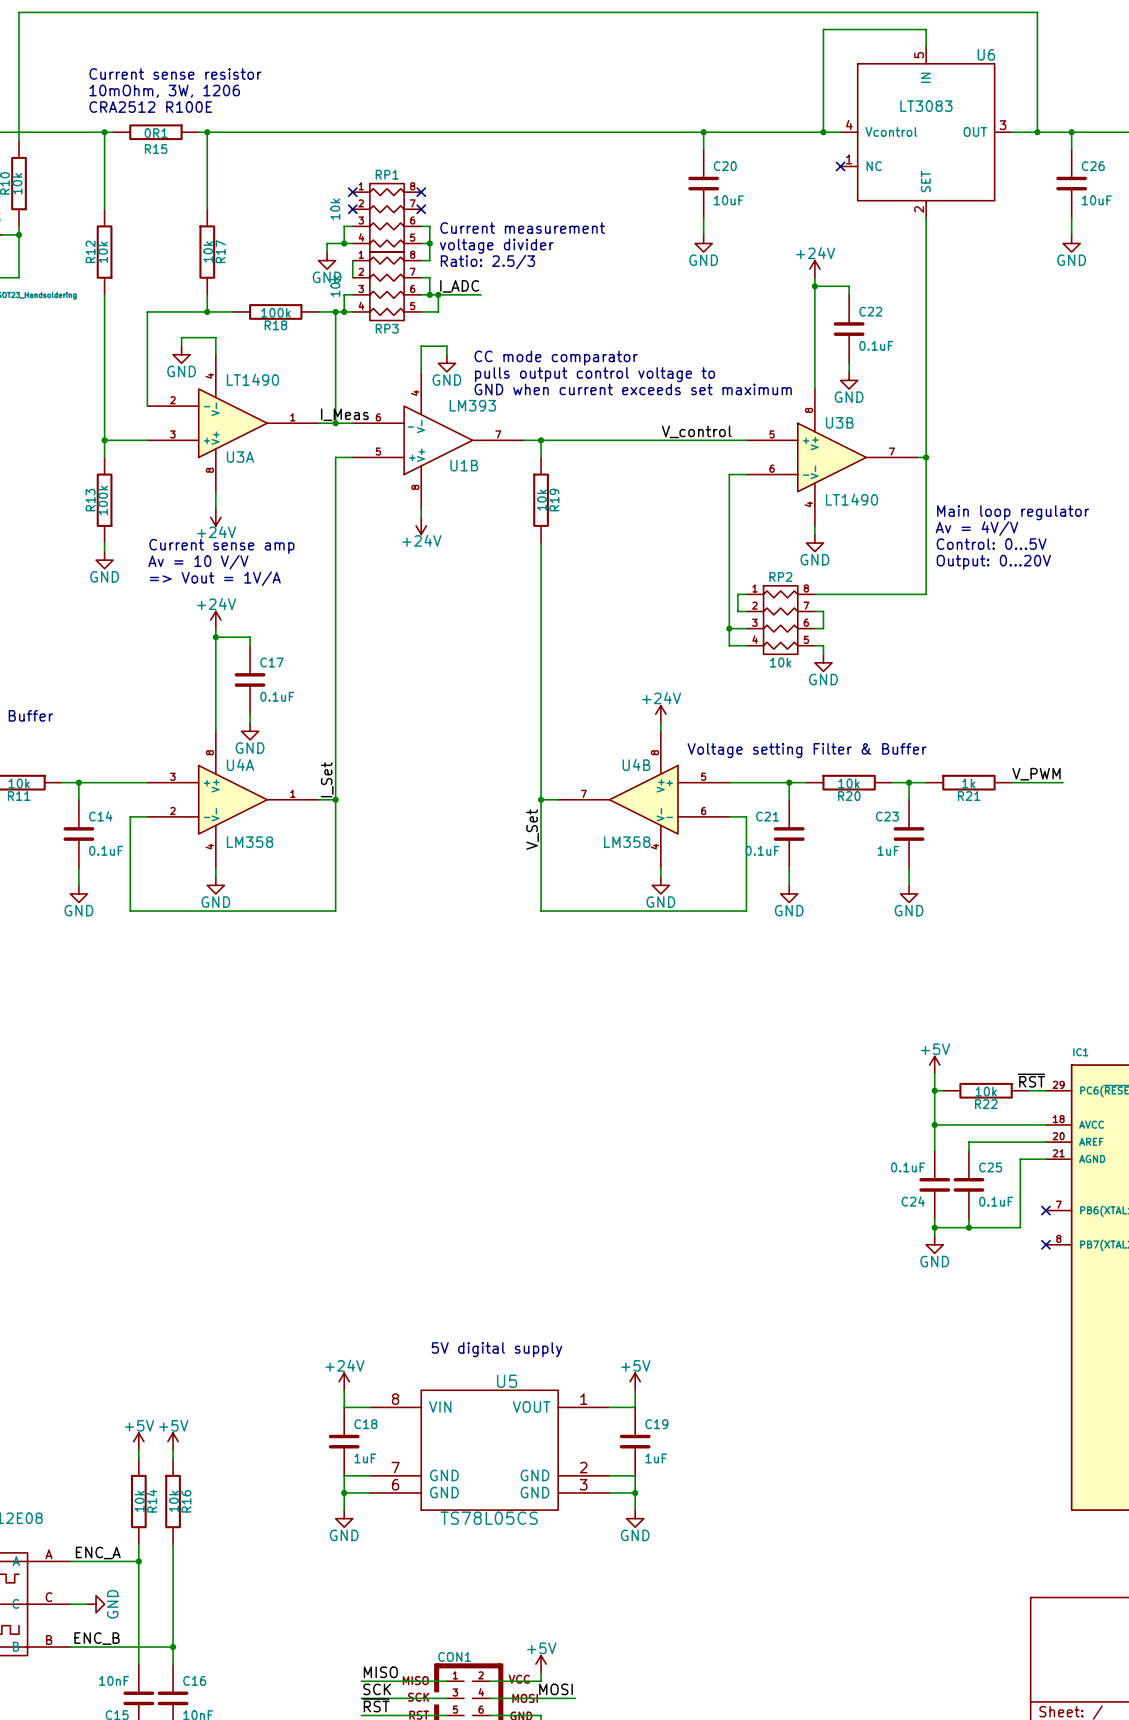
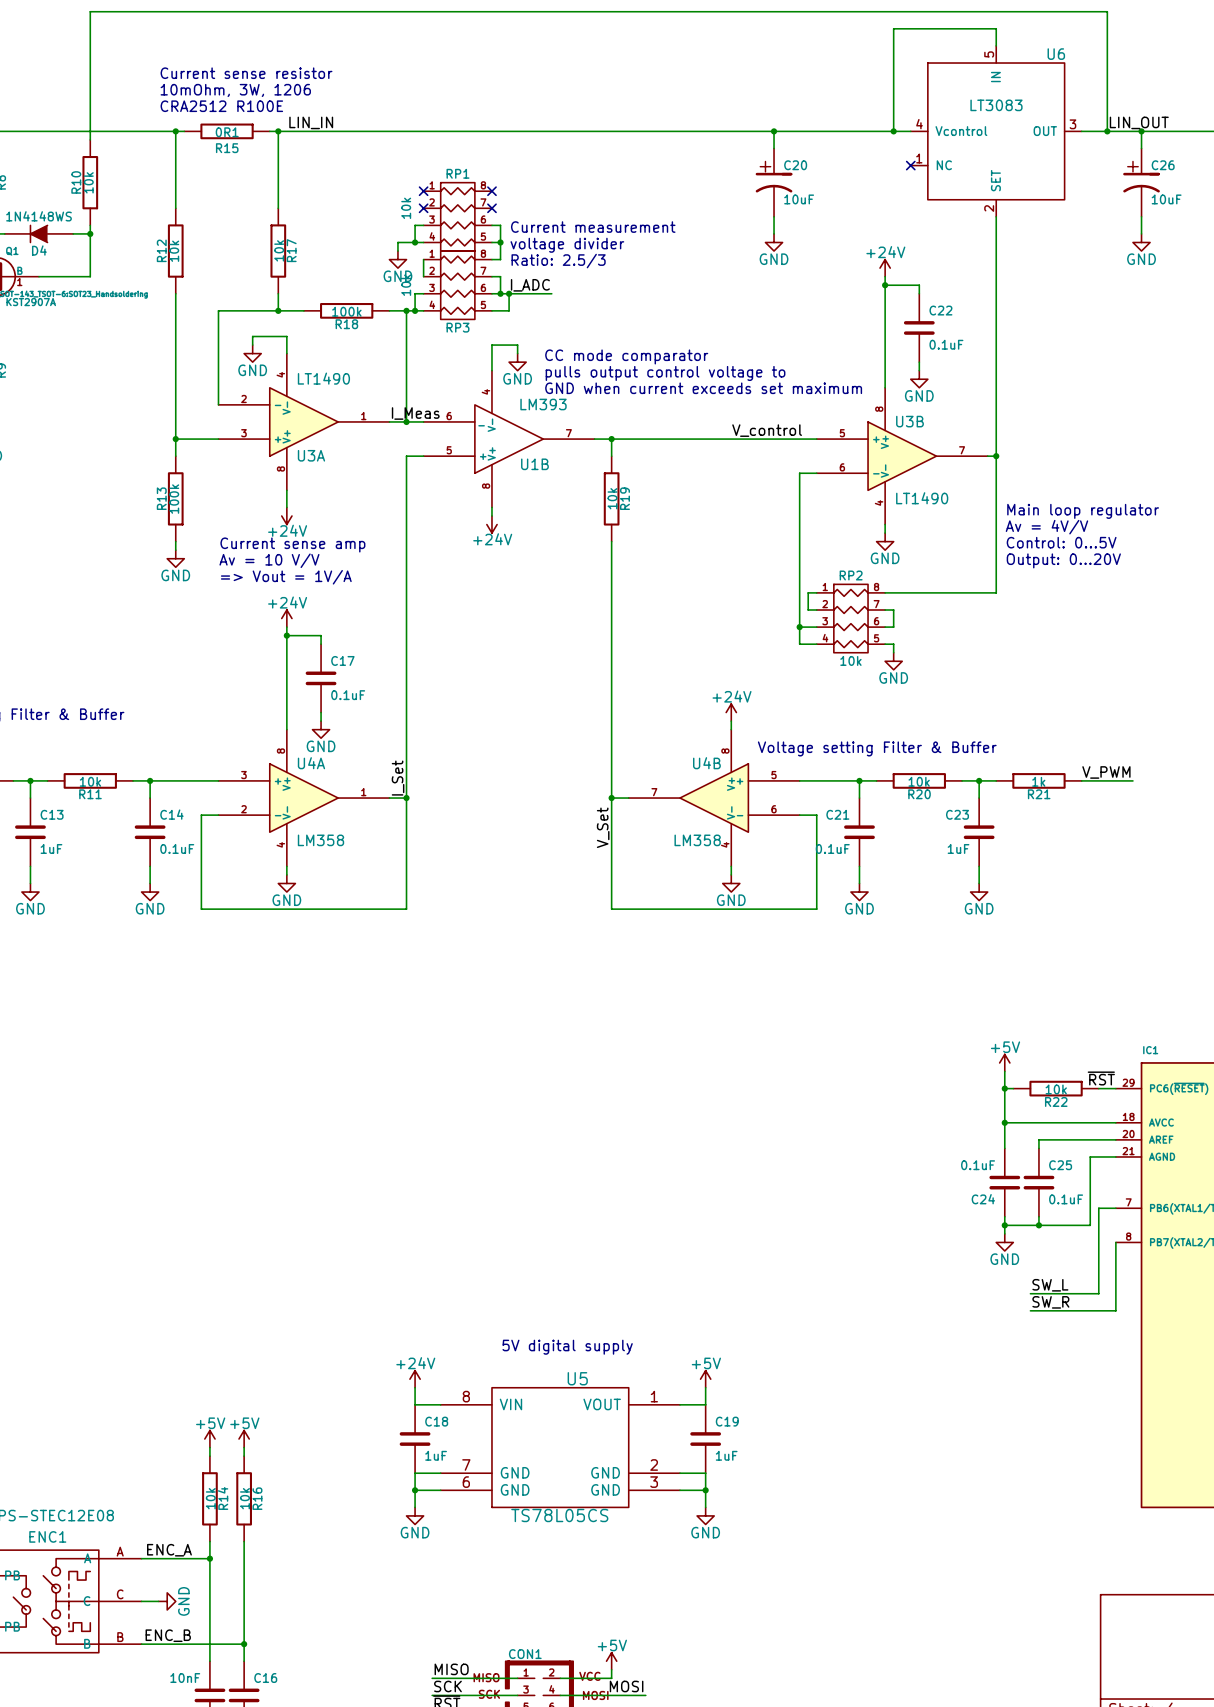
label: none -> LIN_IN (311, 122)
label: none -> LIN_OUT (1139, 122)
C20 symbol: [688, 149, 720, 218] -> [755, 148, 793, 217]
C26 symbol: [1056, 149, 1088, 218] -> [1123, 148, 1160, 217]
wire: none -> (1115, 1208) (1098, 1208) (1098, 1293) (1030, 1293)
no-connect mark: (1045, 1210) -> none
wire: none -> (1115, 1242) (1115, 1310) (1030, 1310)
no-connect mark: (1045, 1244) -> none
label: none -> SW_L (1050, 1285)
label: none -> SW_R (1050, 1302)

